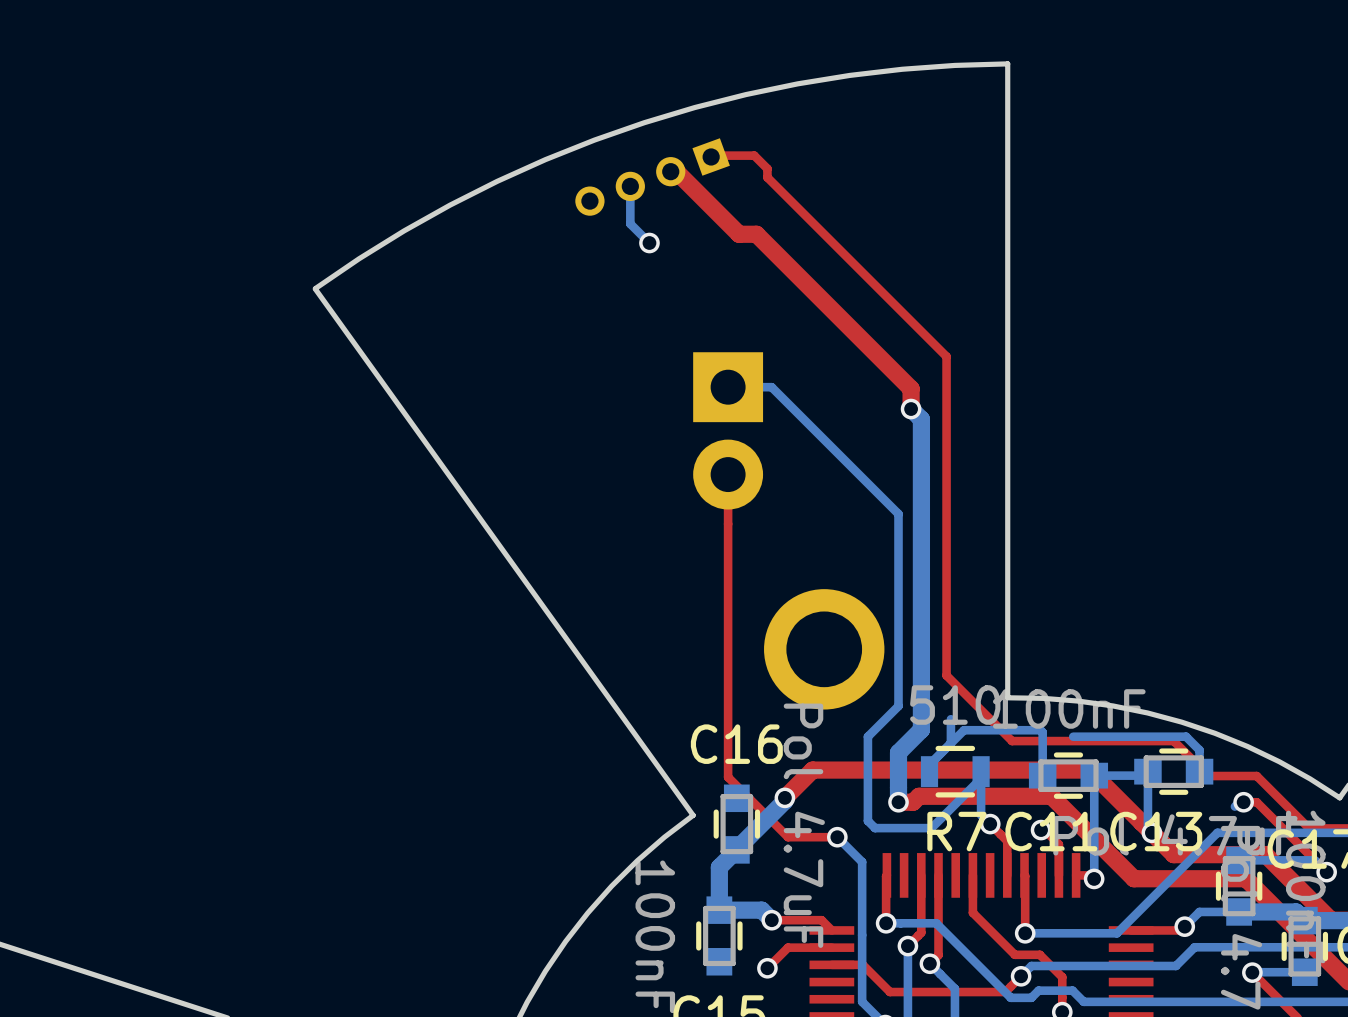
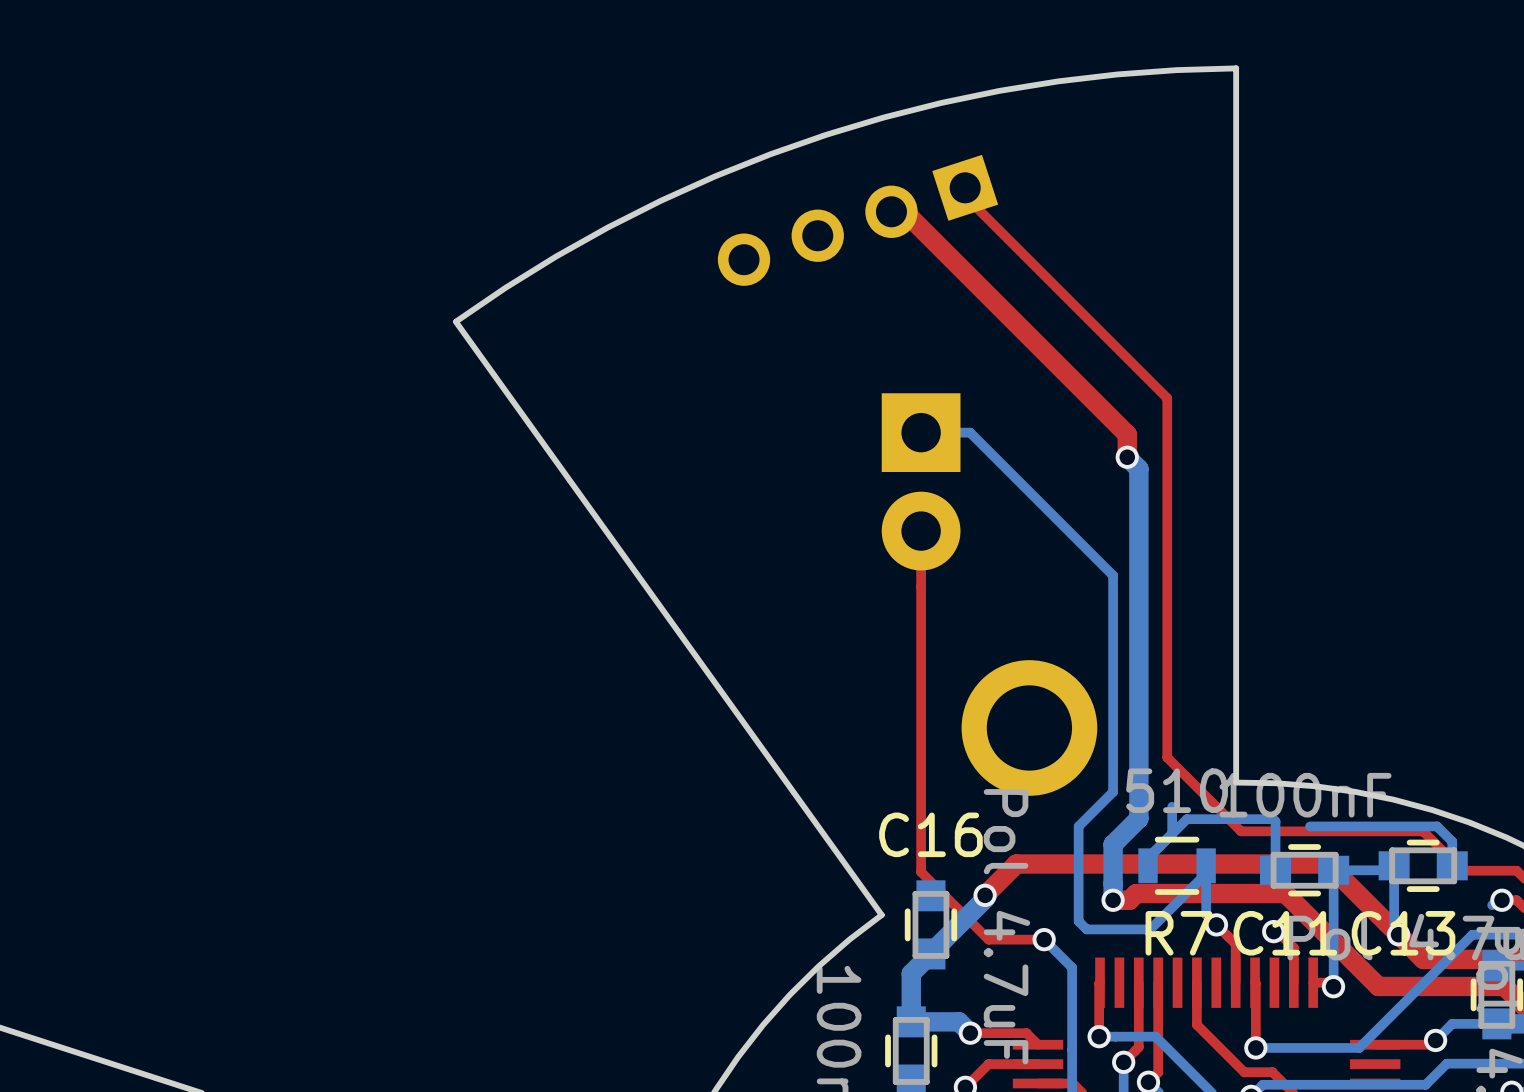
part footprint: [575, 138, 730, 216] -> [717, 154, 999, 286]
top track: (710, 155) (754, 155) (767, 168) -> none
top track: (671, 173) (677, 173) (739, 234) (756, 234) -> (896, 211) (903, 211) (953, 260)
bottom track: (630, 186) (630, 223) (649, 243) -> none
via: (649, 243) -> none

